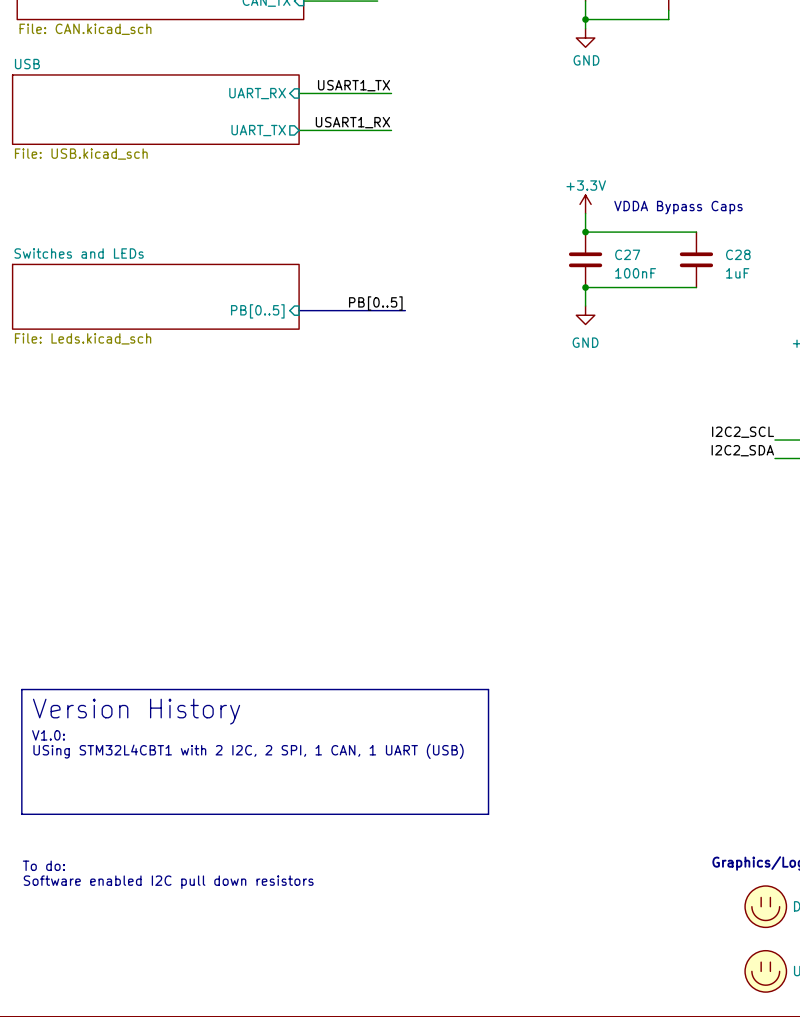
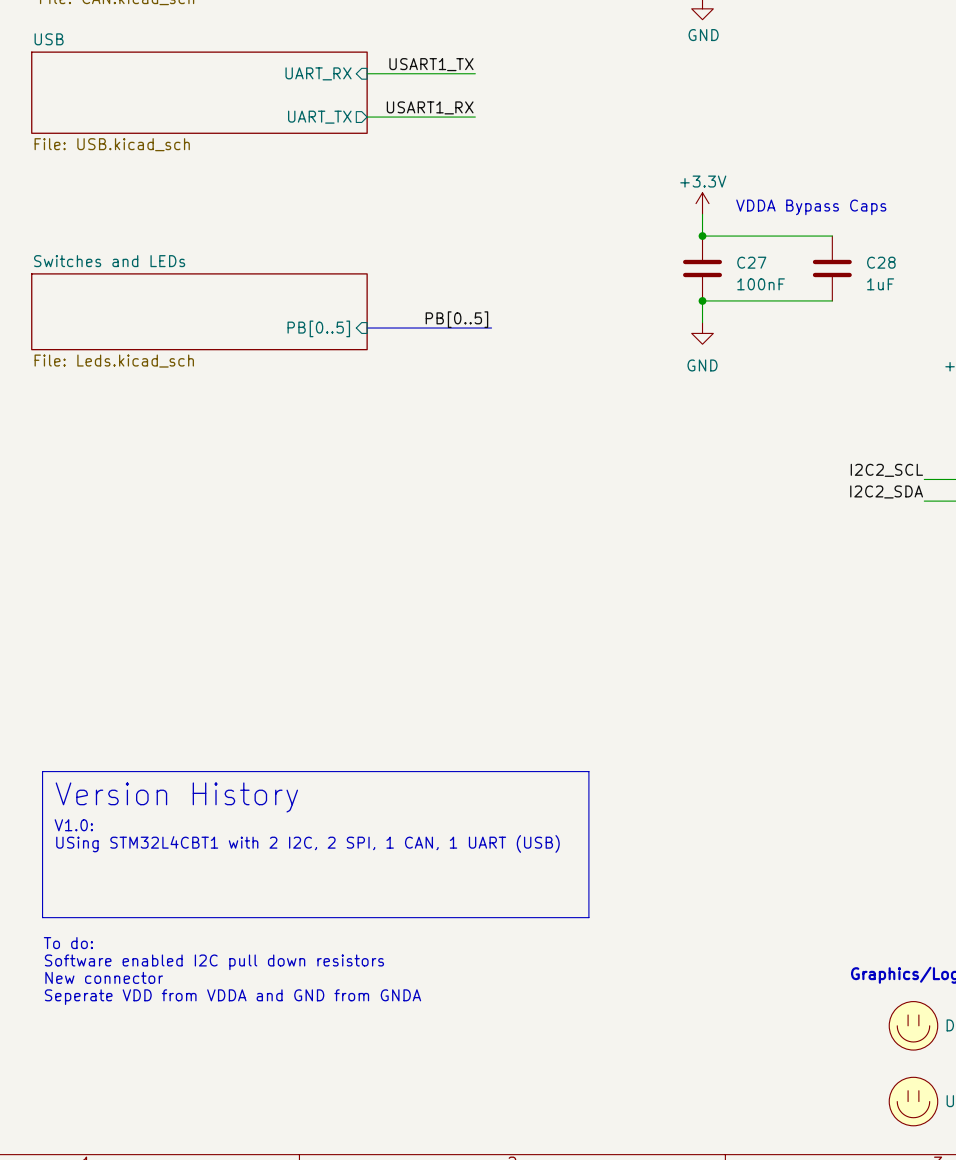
text: none -> To do: (68, 943)
text: none -> Software enabled I2C pull down resistors (214, 962)
text: To do: (43, 865) -> New connector (104, 977)
text: Software enabled I2C pull down resistors (168, 882) -> Seperate VDD from VDDA and GND from GNDA (233, 997)

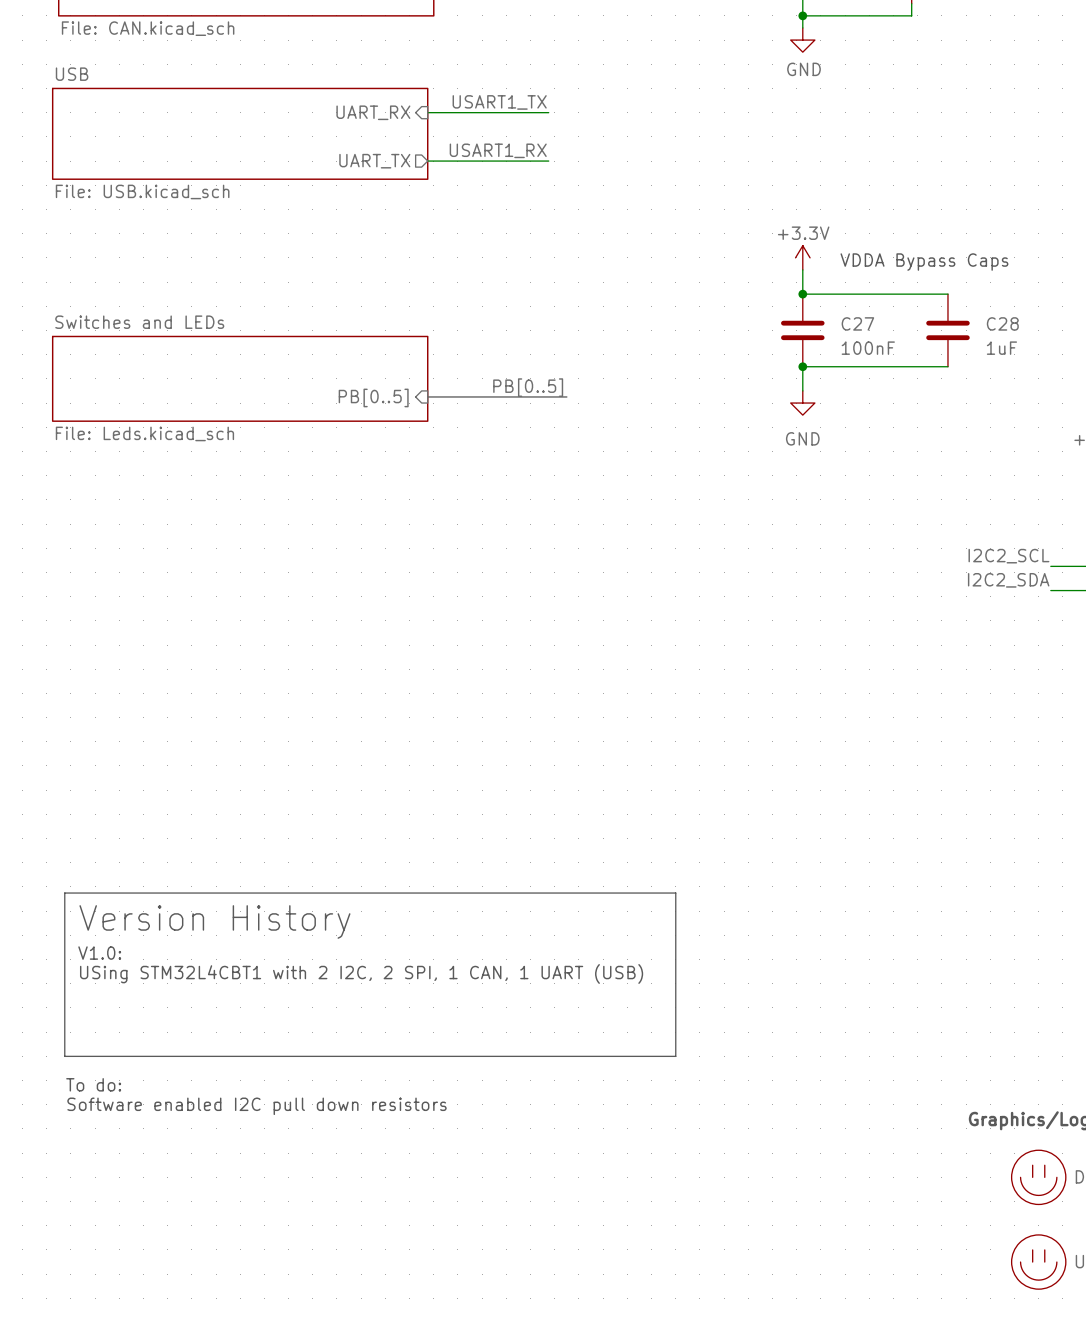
text: New connector (104, 977) -> none
text: Seperate VDD from VDDA and GND from GNDA (233, 997) -> none

